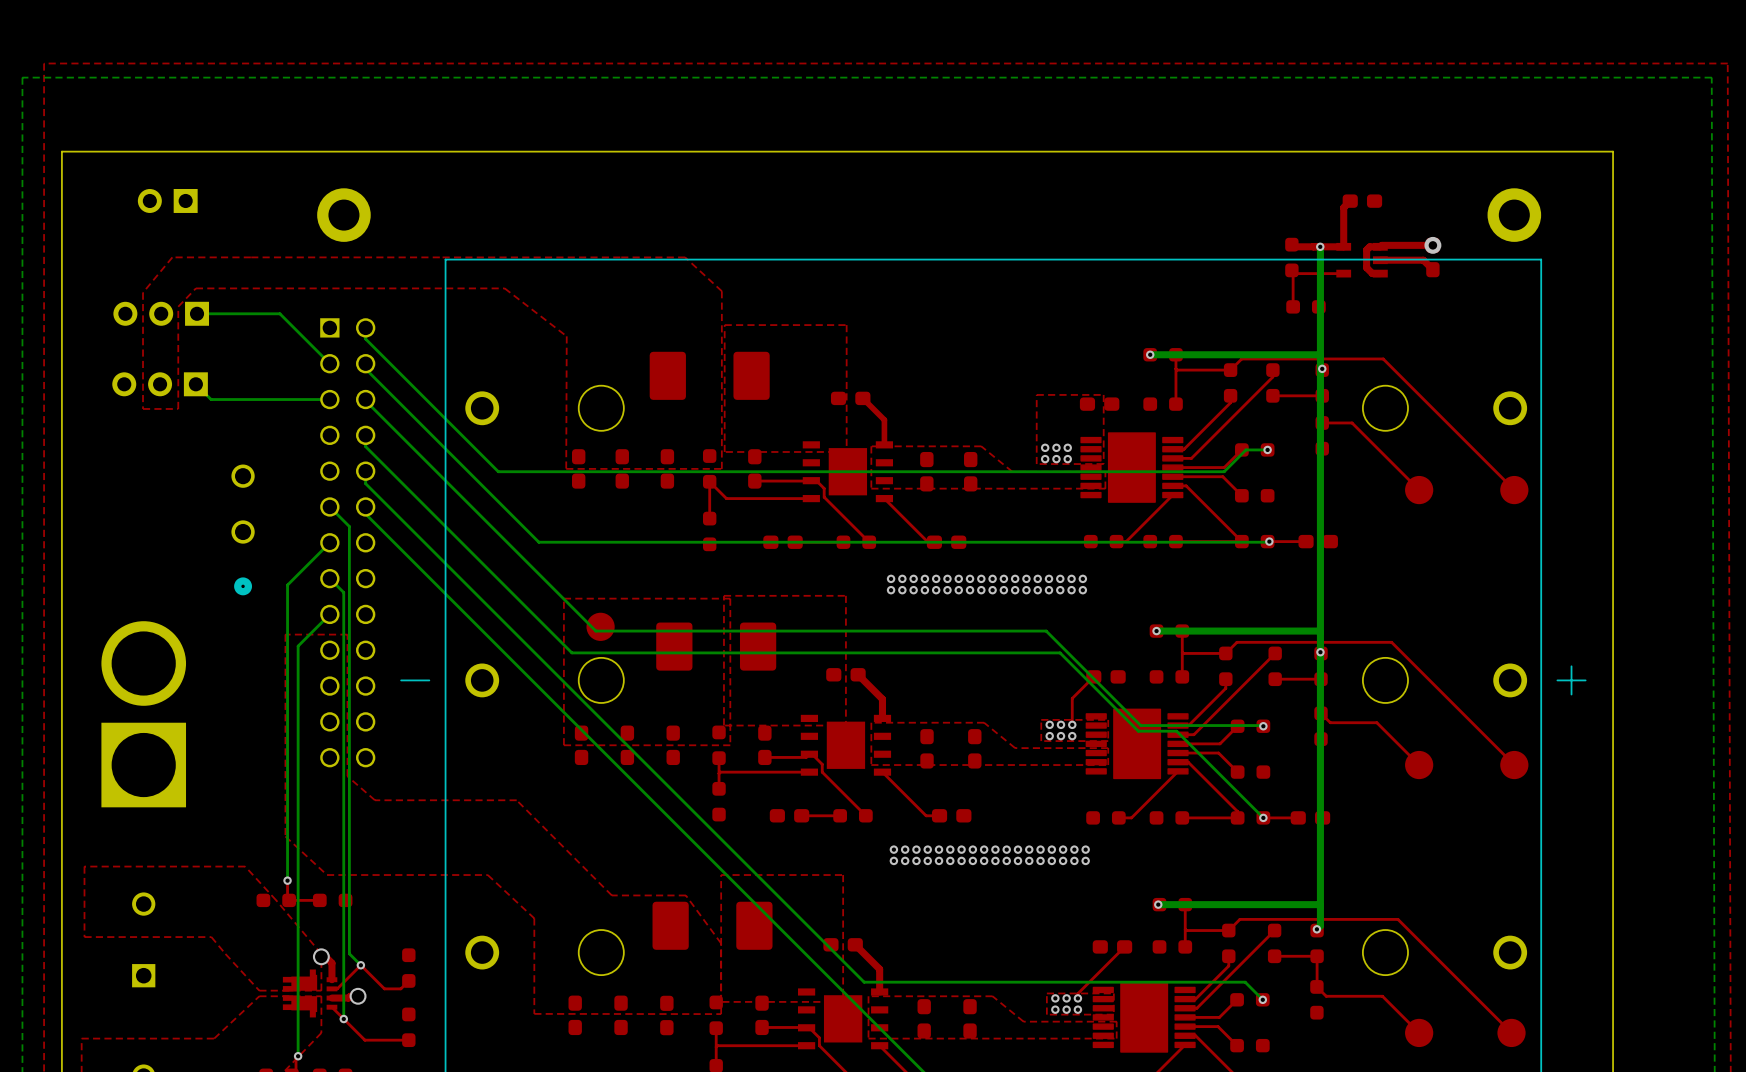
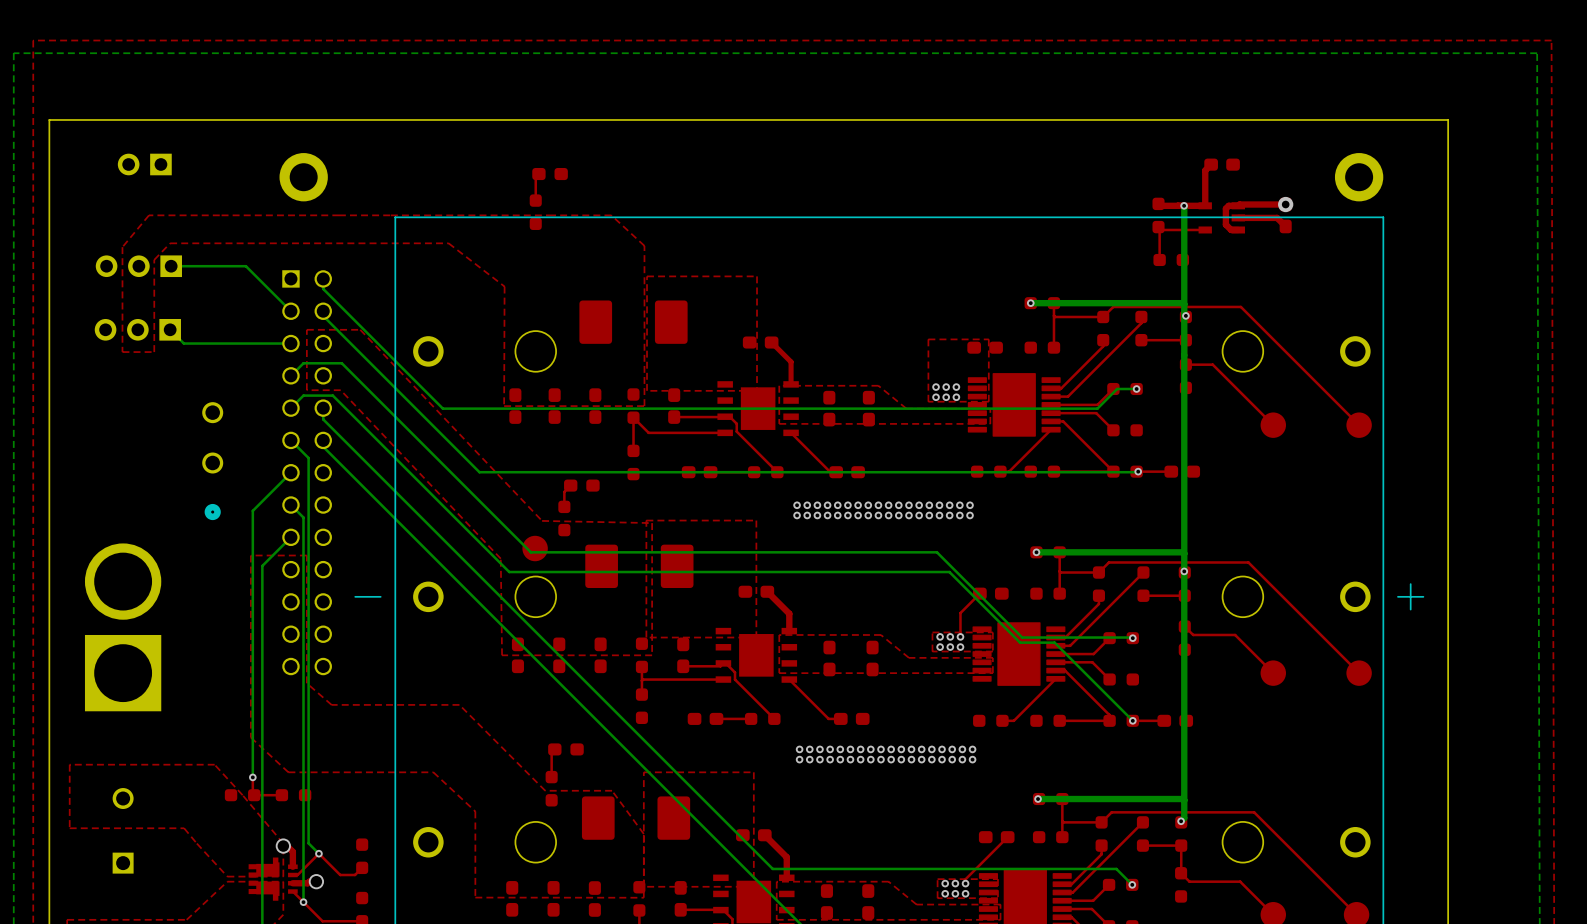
top track: none -> (538, 174) (535, 177) (535, 200)
part: none -> (550, 174)
part: none -> (535, 212)
bottom track: (365, 400) (386, 421) -> (290, 375) (303, 363) (341, 363)
bottom track: (365, 435) (365, 446) (376, 457) -> (290, 408) (303, 395) (332, 395)
top track: none -> (570, 485) (564, 491) (564, 506)
part: none -> (581, 485)
part: none -> (564, 518)
top zone outline: (730, 598) (563, 598) (563, 745) -> (652, 523) (542, 520) (360, 329) (306, 329) (306, 390) (340, 390) (500, 558) (502, 655)
top track: none -> (554, 749) (551, 752) (551, 777)
part: none -> (565, 749)
part: none -> (551, 788)

